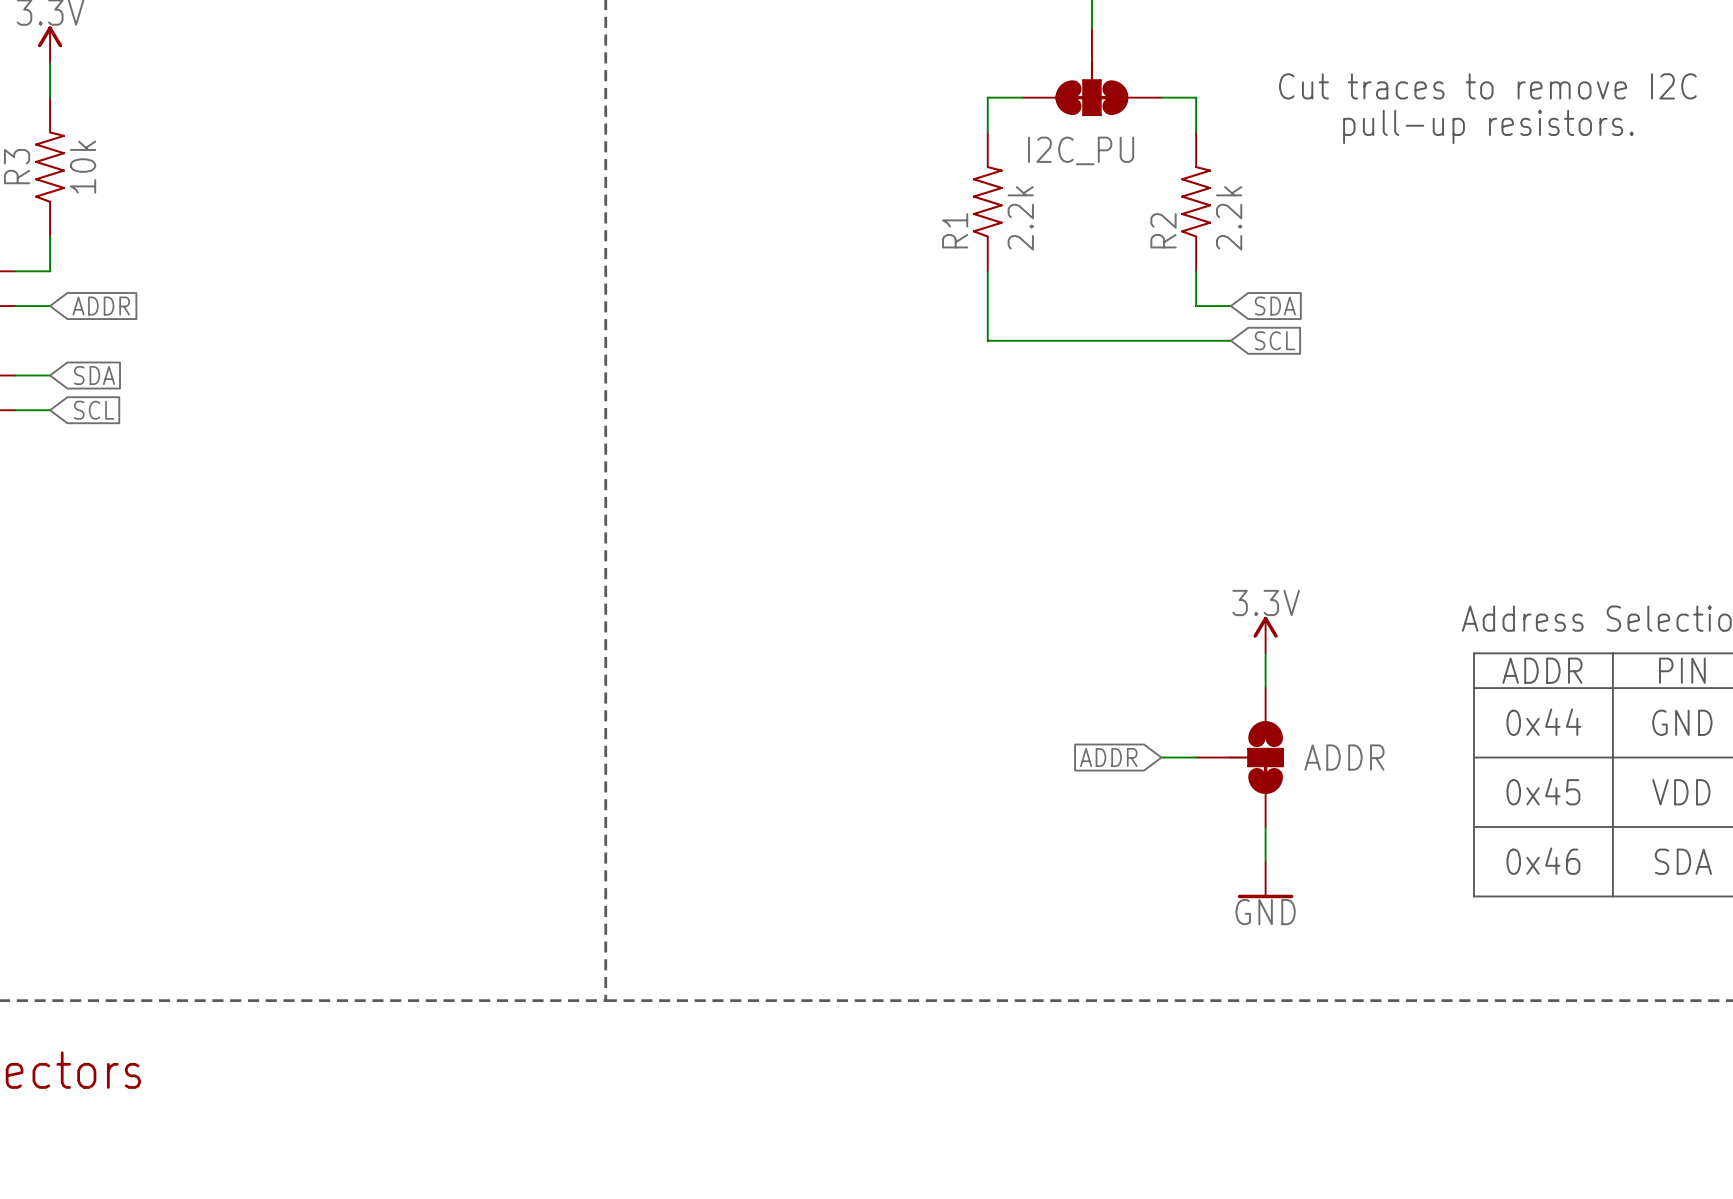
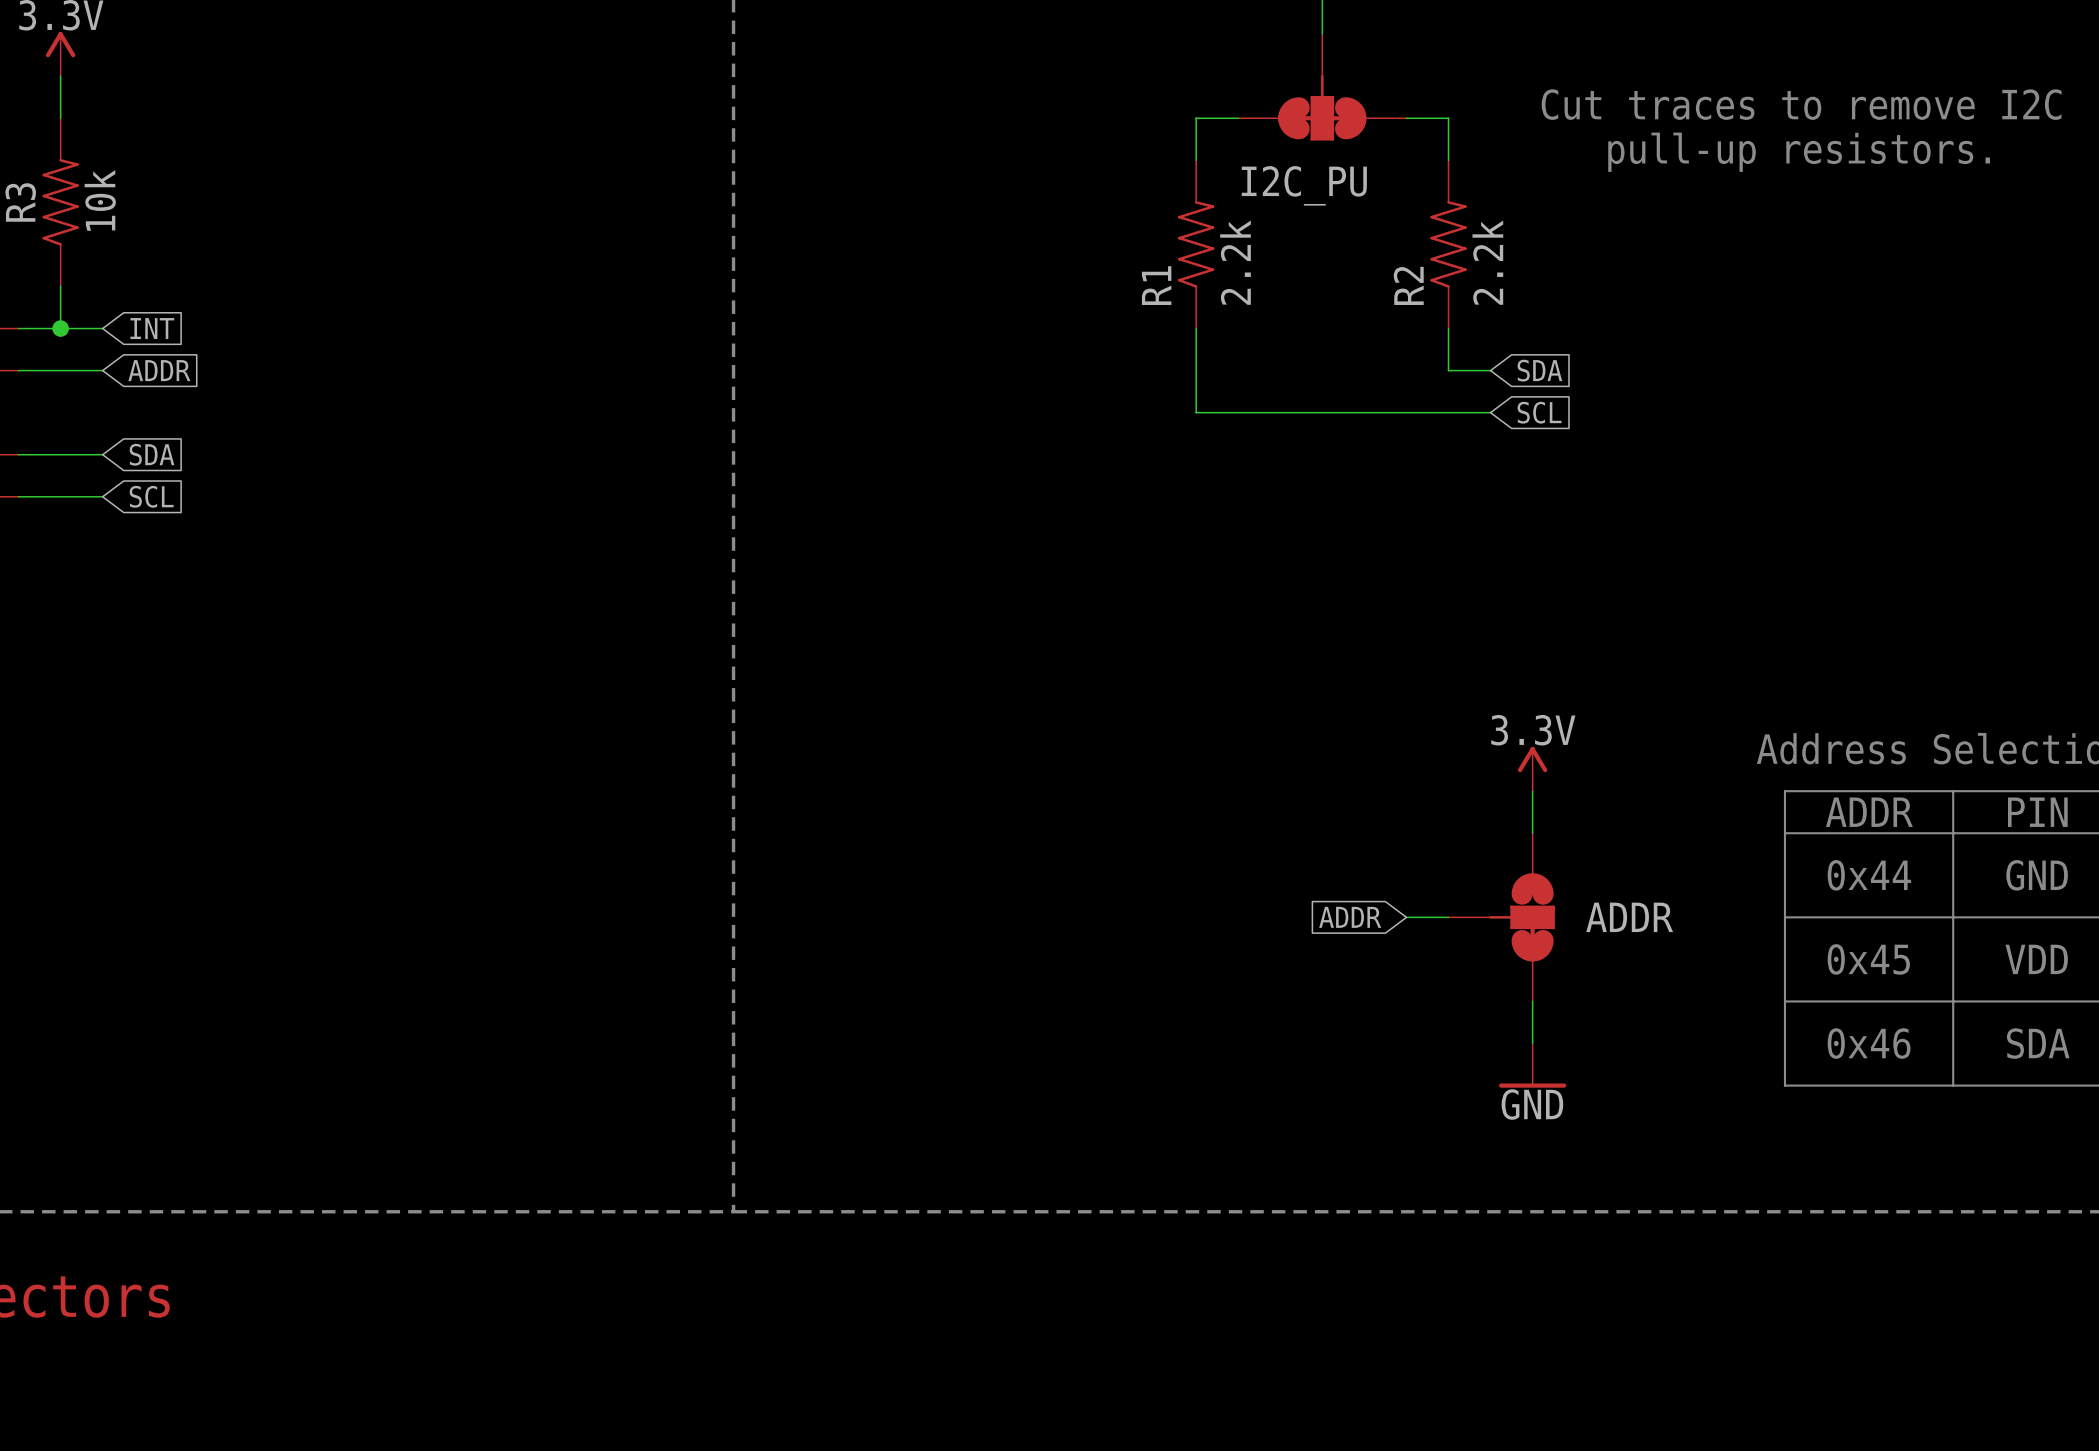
wire: none -> (60, 328) (102, 328)
junction: none -> (60, 328)
global label: none -> INT (152, 328)
wire: none -> (60, 370) (102, 370)
global label position: ADDR (101, 306) -> ADDR (159, 370)
wire: none -> (60, 454) (102, 454)
global label position: SDA (94, 375) -> SDA (152, 454)
wire: none -> (60, 496) (102, 496)
global label position: SCL (94, 410) -> SCL (151, 496)

